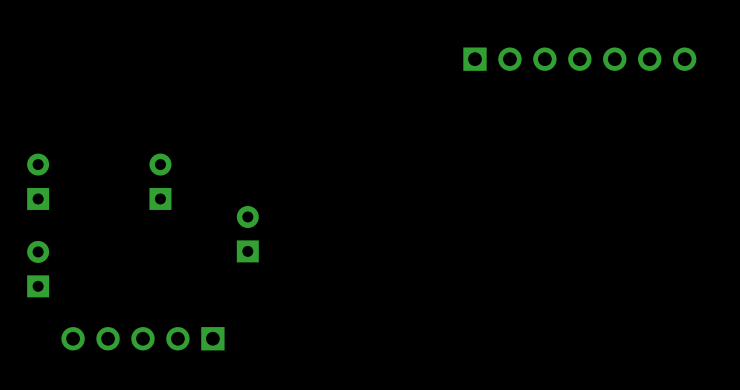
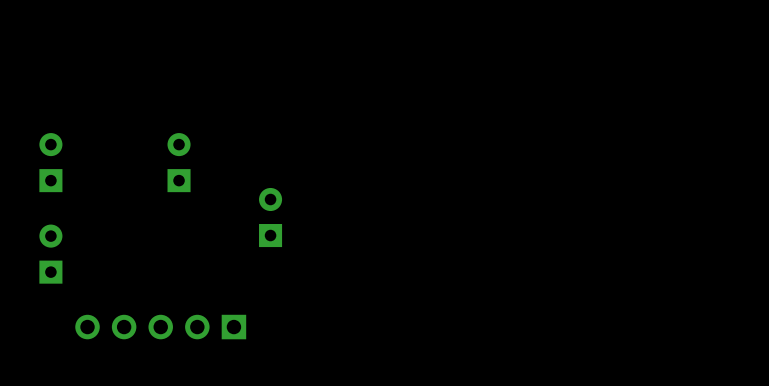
part: (579, 59) -> none

